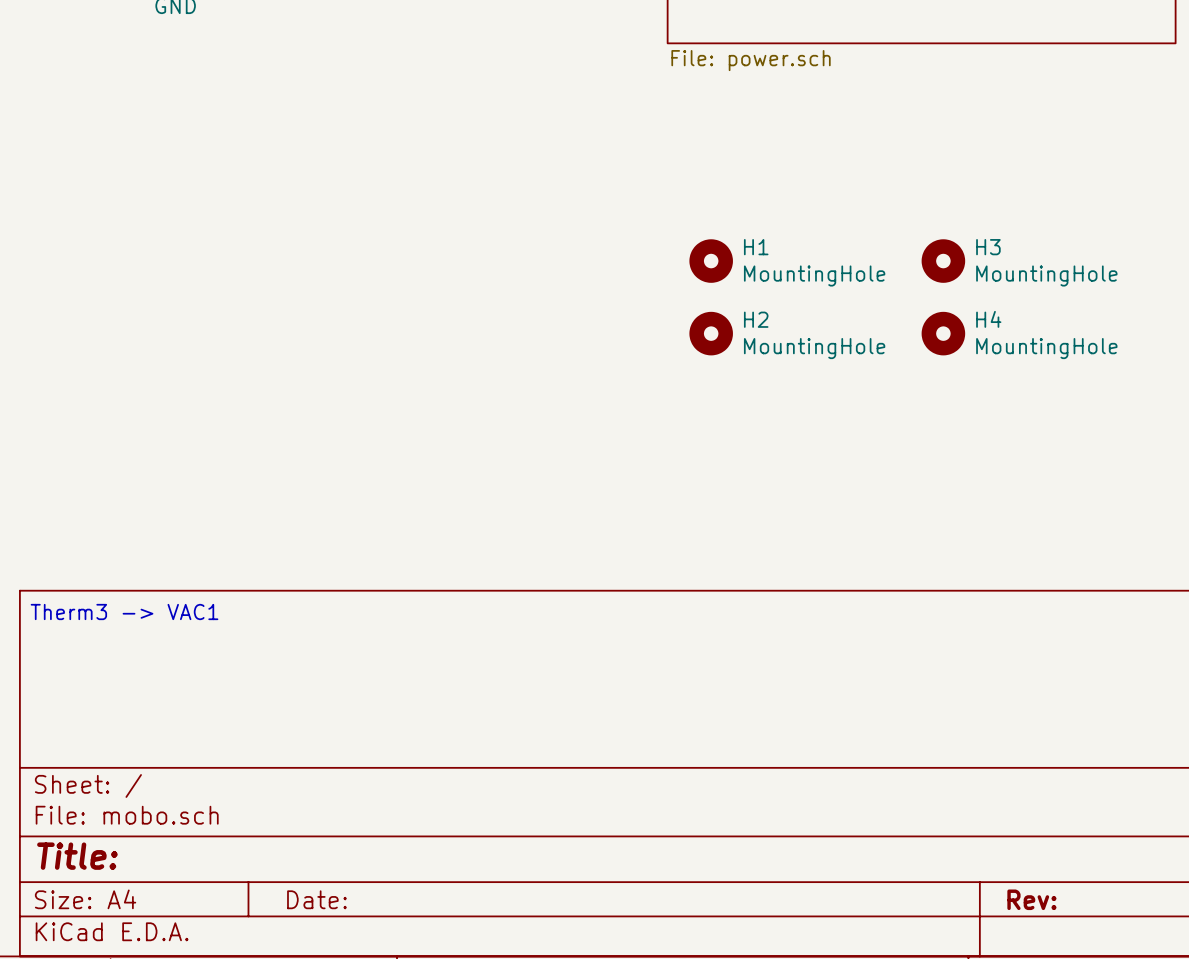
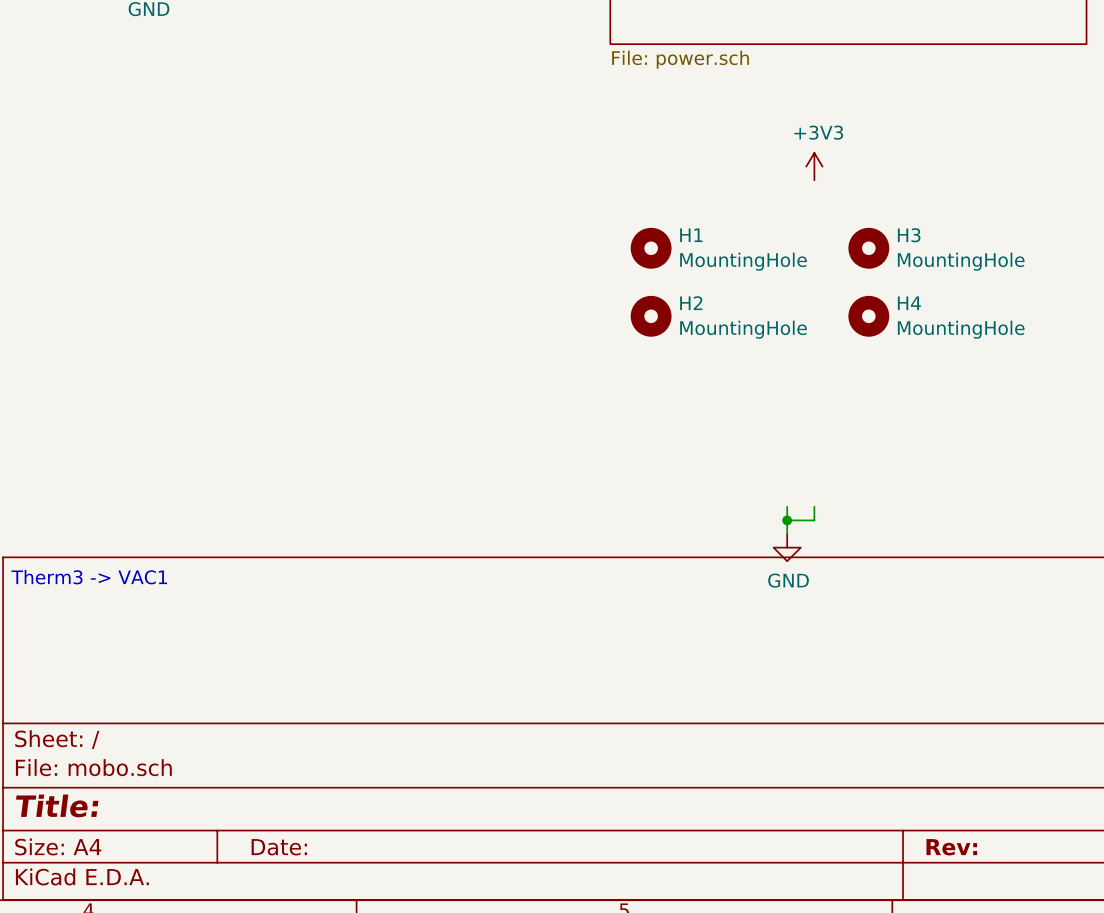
power symbol: none -> +3V3 (814, 166)
wire: none -> (787, 506) (787, 534)
wire: none -> (814, 506) (814, 520) (787, 520)
junction: none -> (787, 520)
power symbol: none -> GND (787, 547)

